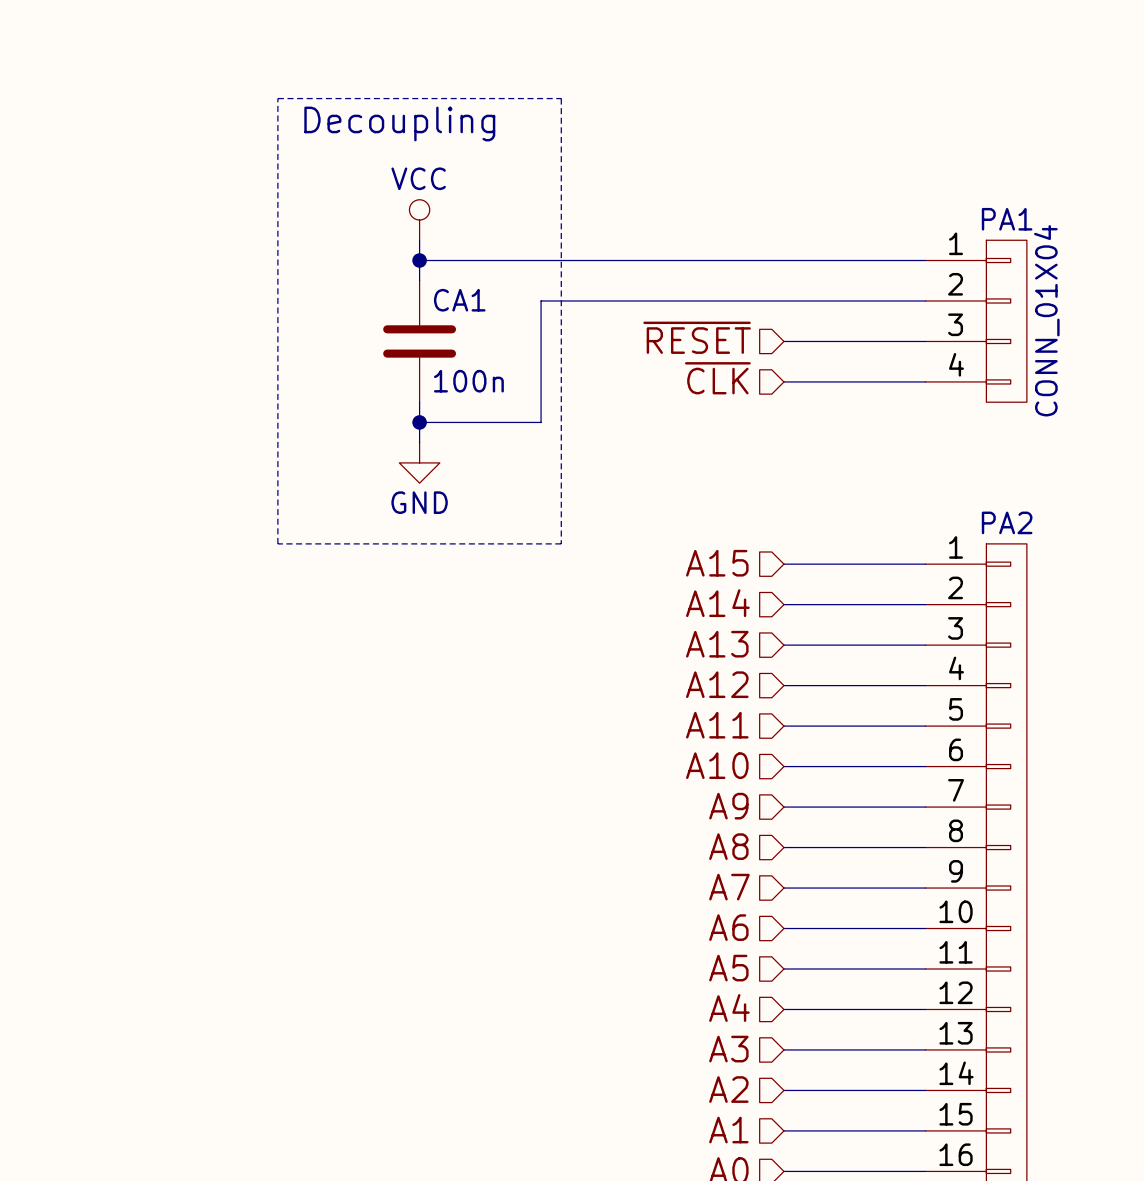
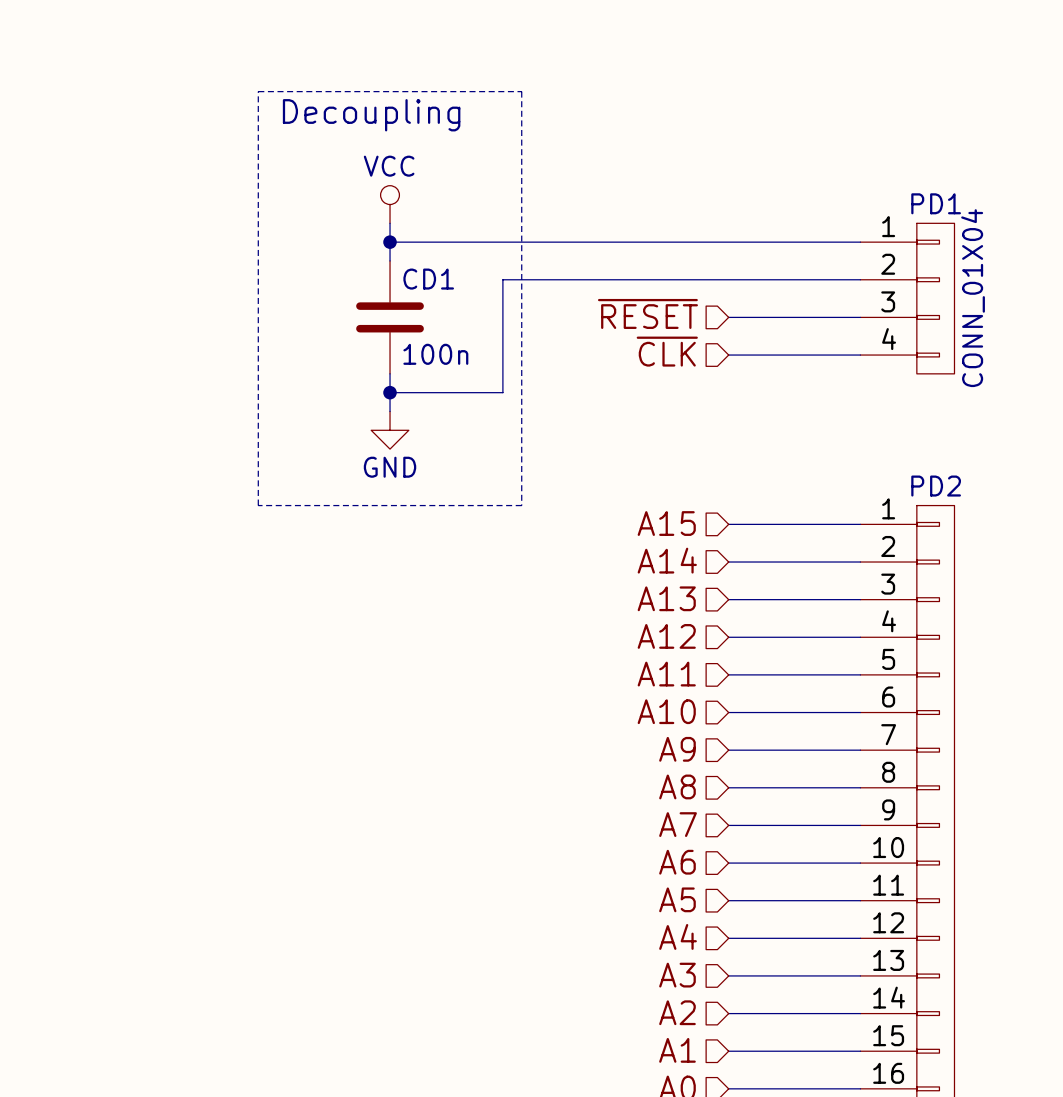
PA1 name: PA1 (1007, 219) -> PD1 (936, 203)
CA1 name: CA1 (459, 300) -> CD1 (428, 279)
PA2 name: PA2 (1007, 522) -> PD2 (936, 486)

